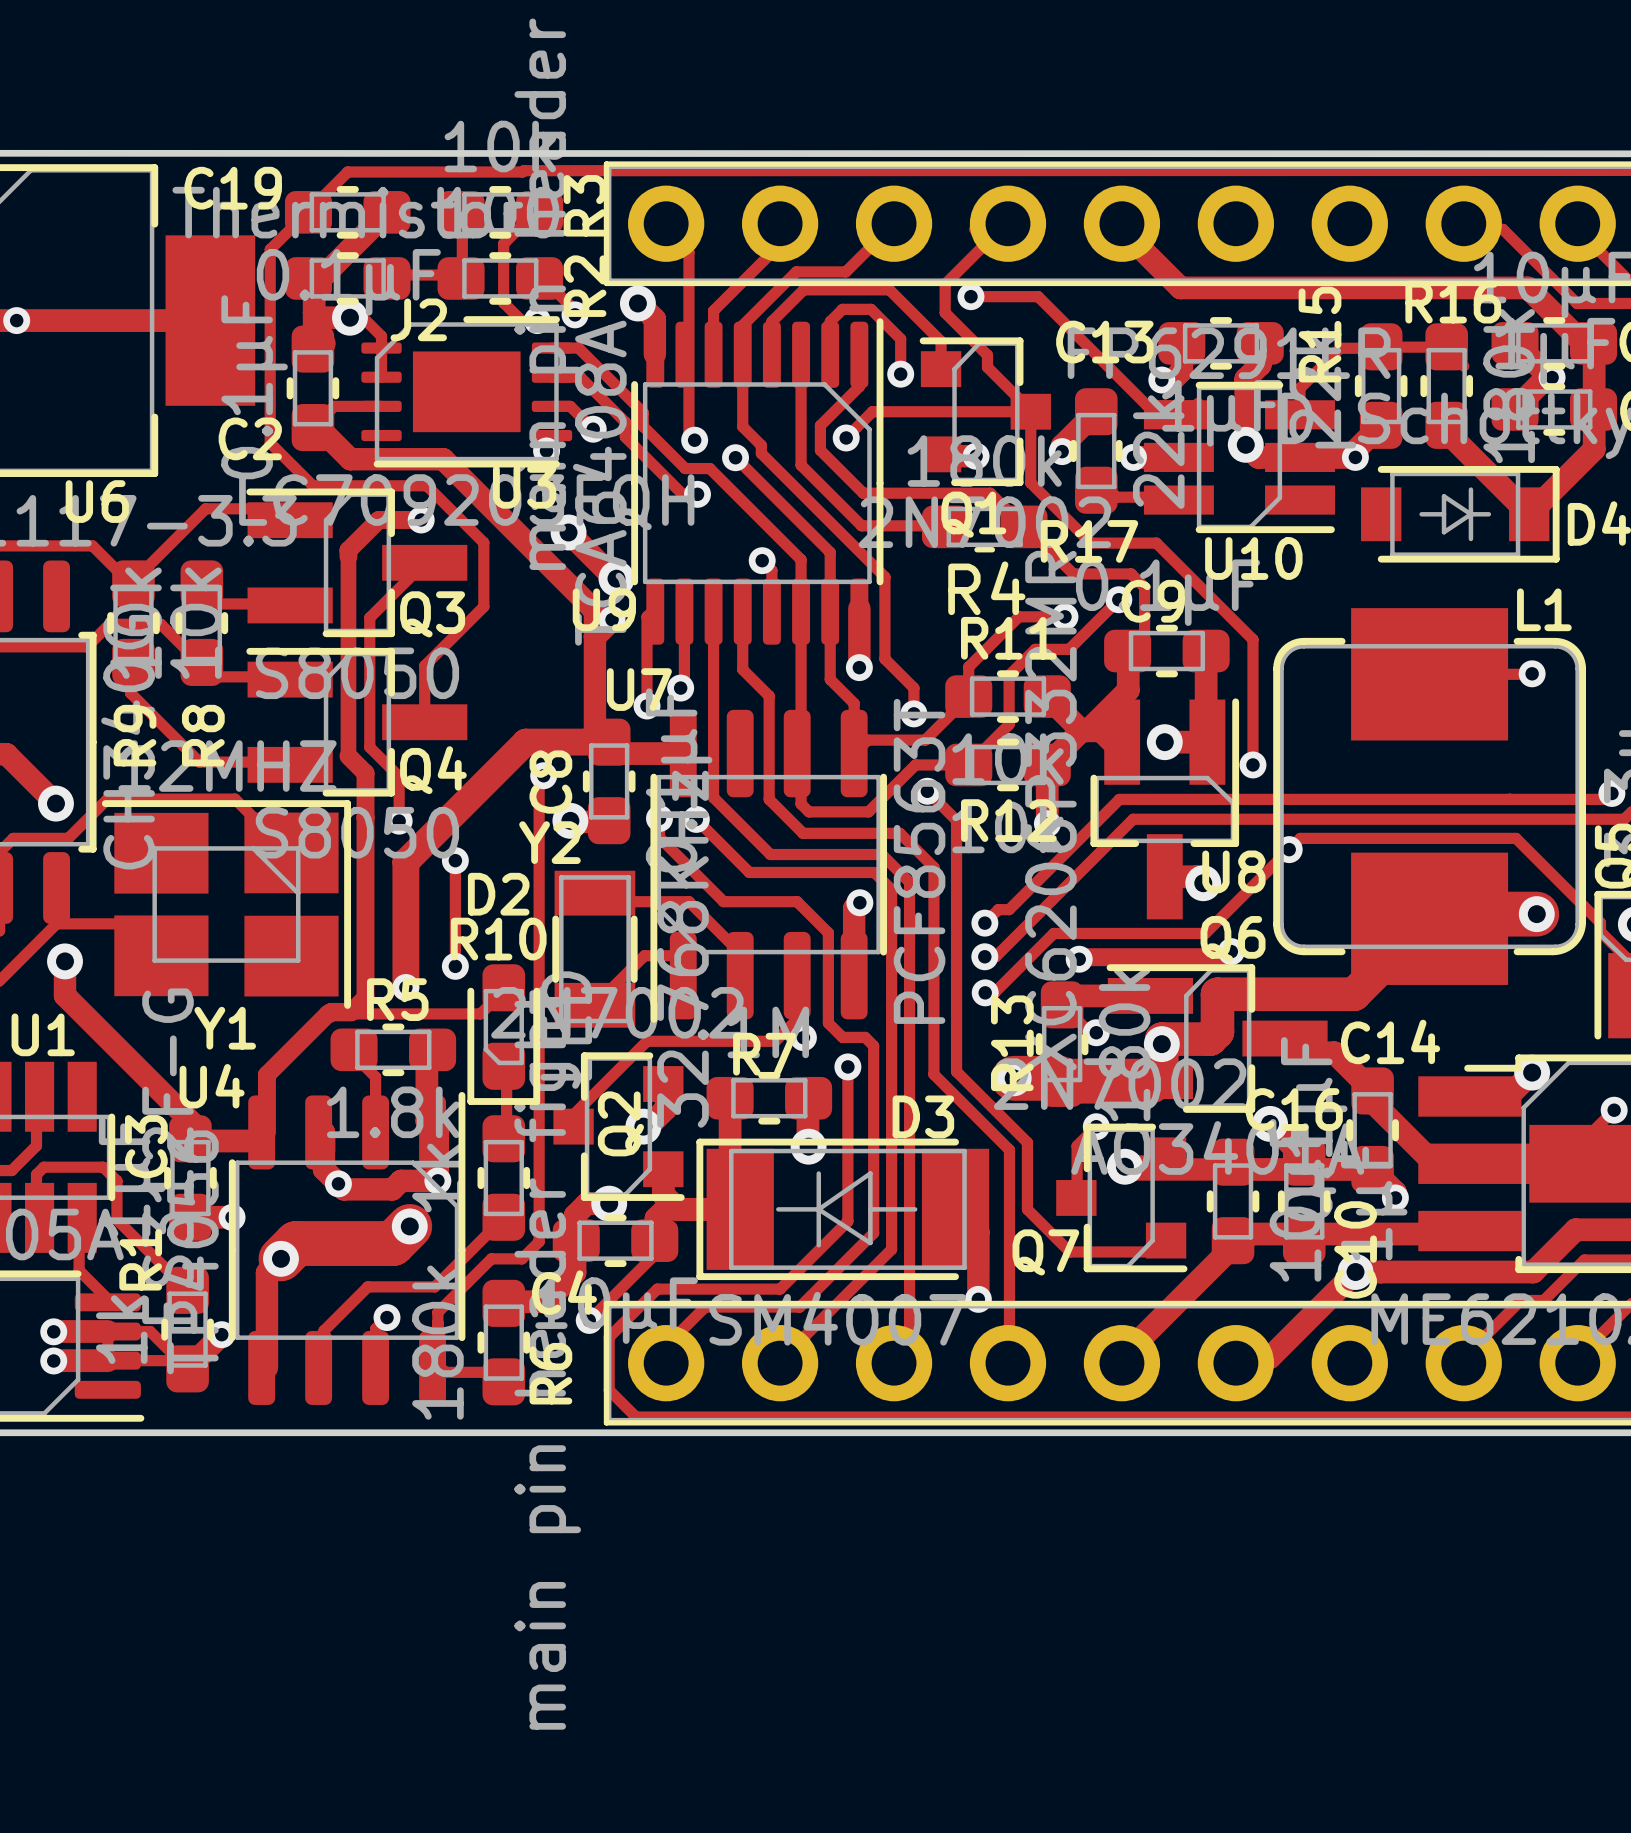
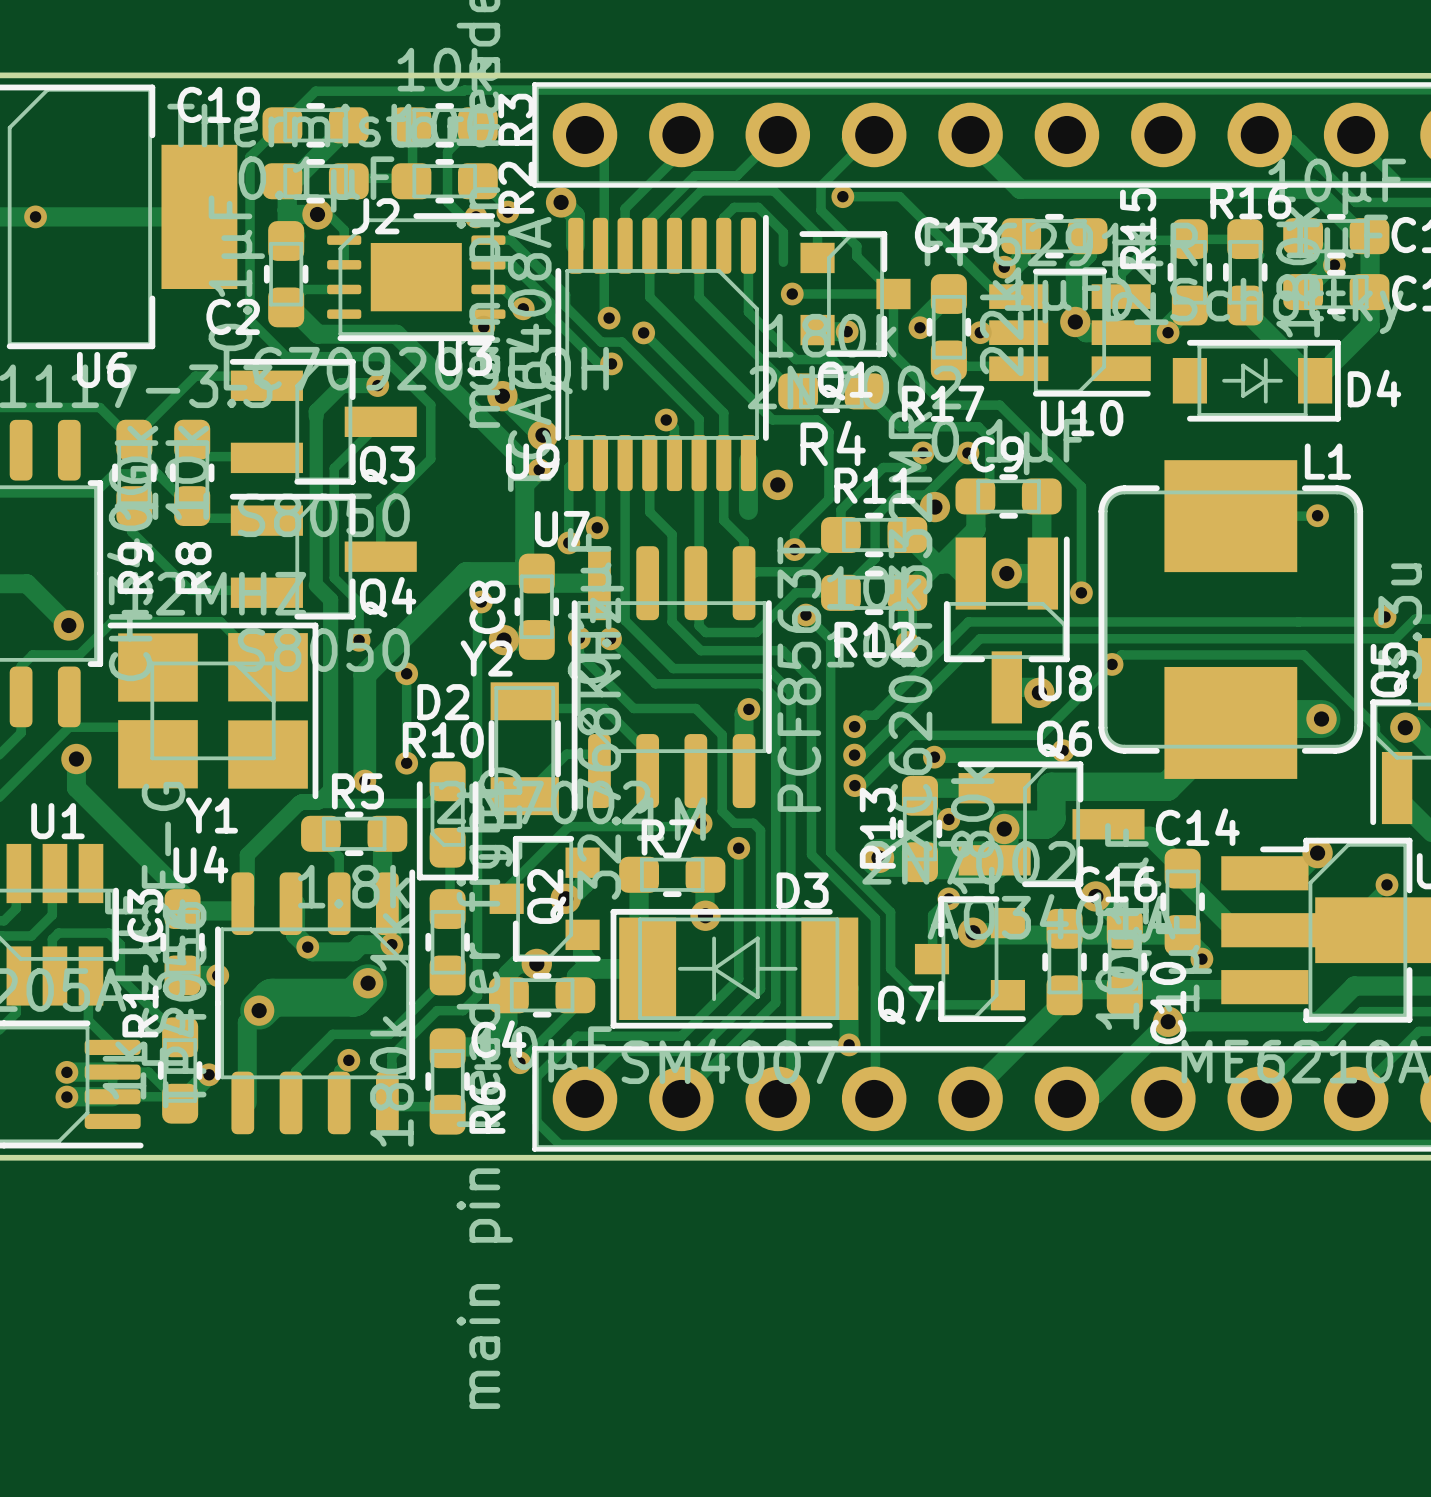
via: (900, 374) -> none
track: (859, 386) (820, 425) (820, 450) (863, 493) (990, 493) (1073, 573) (1131, 573) (1144, 587) -> (748, 272) (748, 312) (796, 359) (832, 359) (899, 426) (978, 426) (989, 438) (989, 442)
track: (911, 411) (872, 411) (846, 437) -> none
via: none -> (792, 294)
track: (742, 415) (742, 426) (761, 445) (761, 453) (884, 576) (884, 659) (913, 688) (913, 694) -> (649, 297) (772, 419) (816, 419) (828, 432) (828, 499) (794, 533)
track: (801, 415) (801, 465) (861, 525) (945, 526) -> (699, 297) (793, 391) (798, 391)
via: (846, 437) -> none
R4 position: (984, 526) -> (831, 391)
via position: (1064, 616) -> (923, 452)
via: none -> (777, 484)
via: none -> (934, 507)
via: (859, 667) -> none

